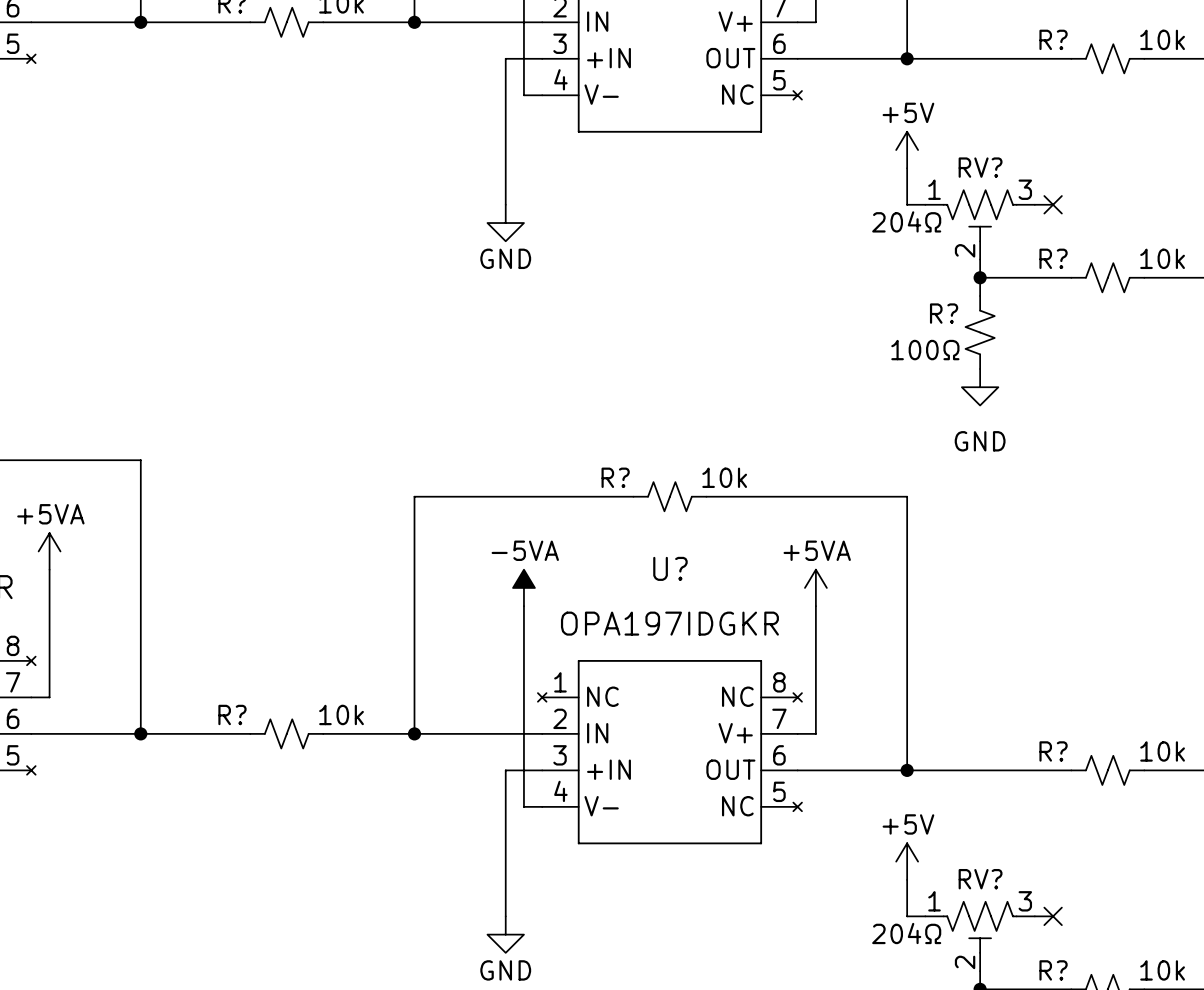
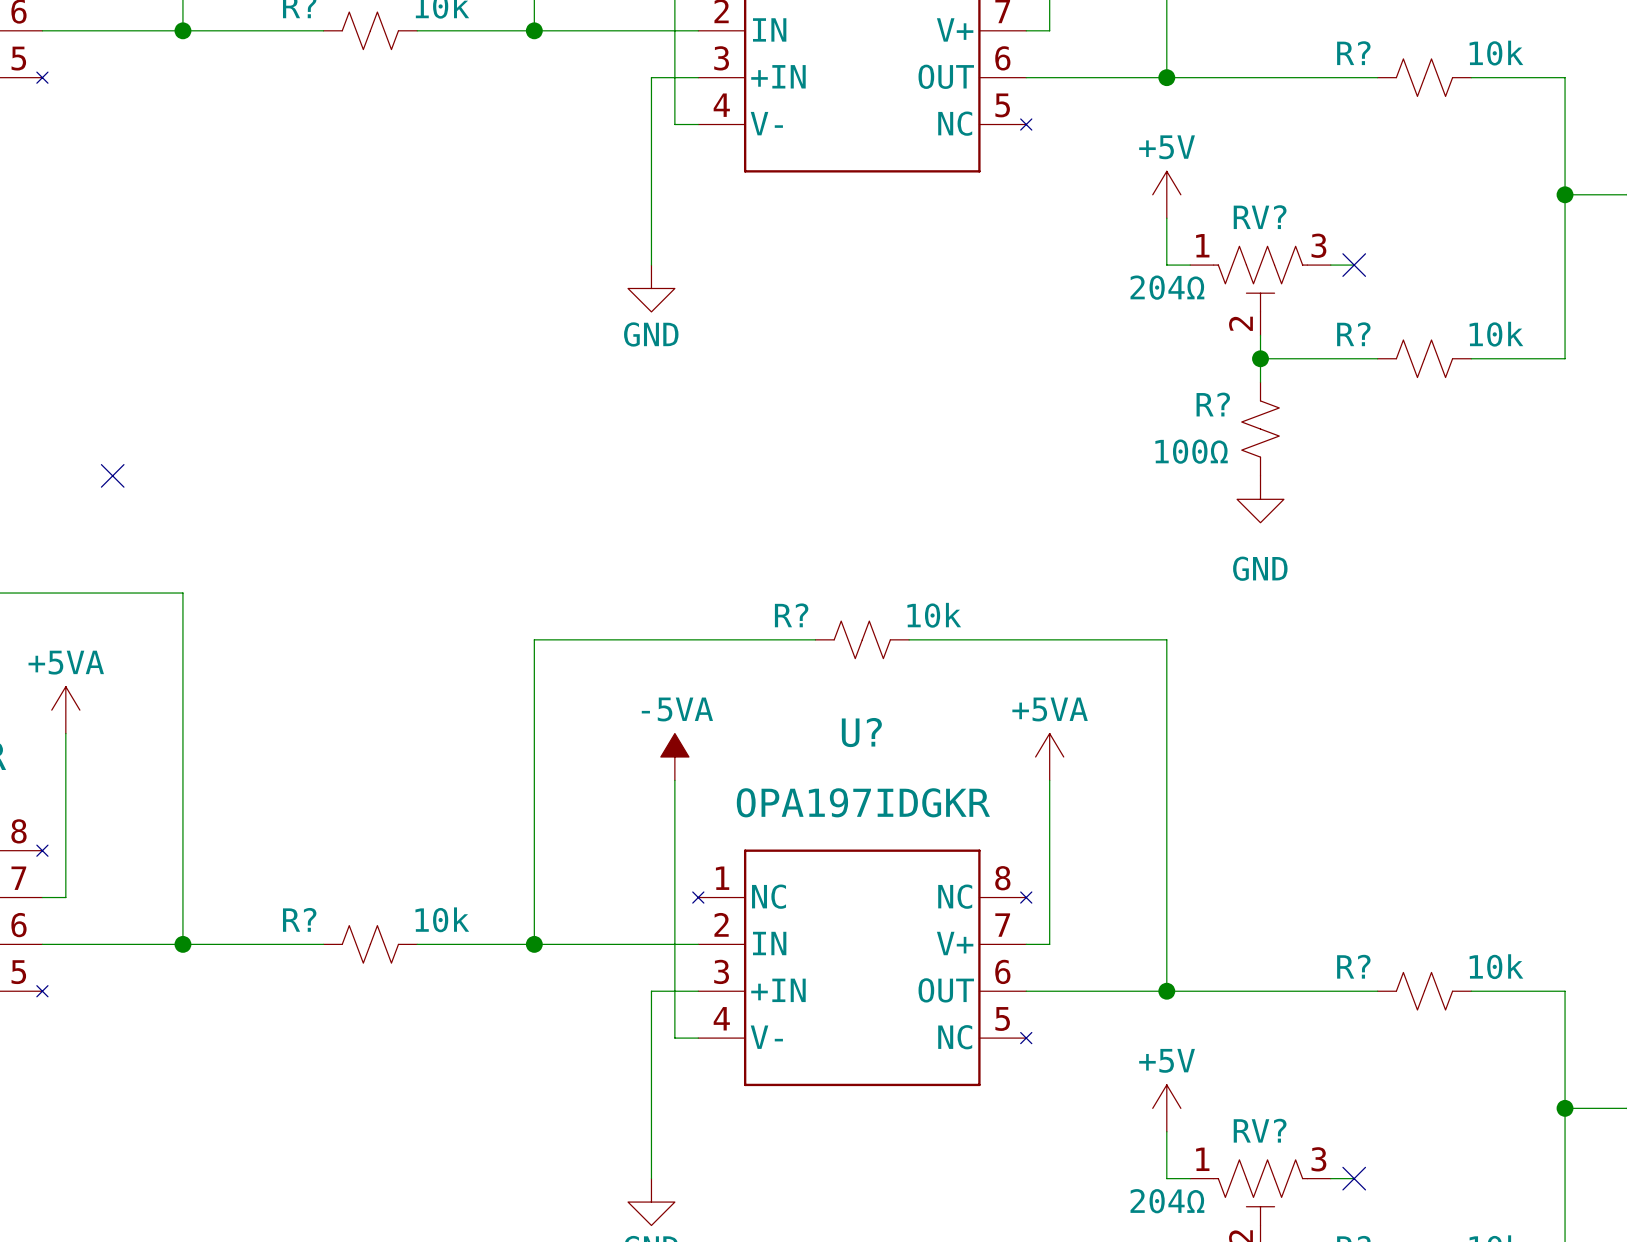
no-connect mark: none -> (112, 475)

